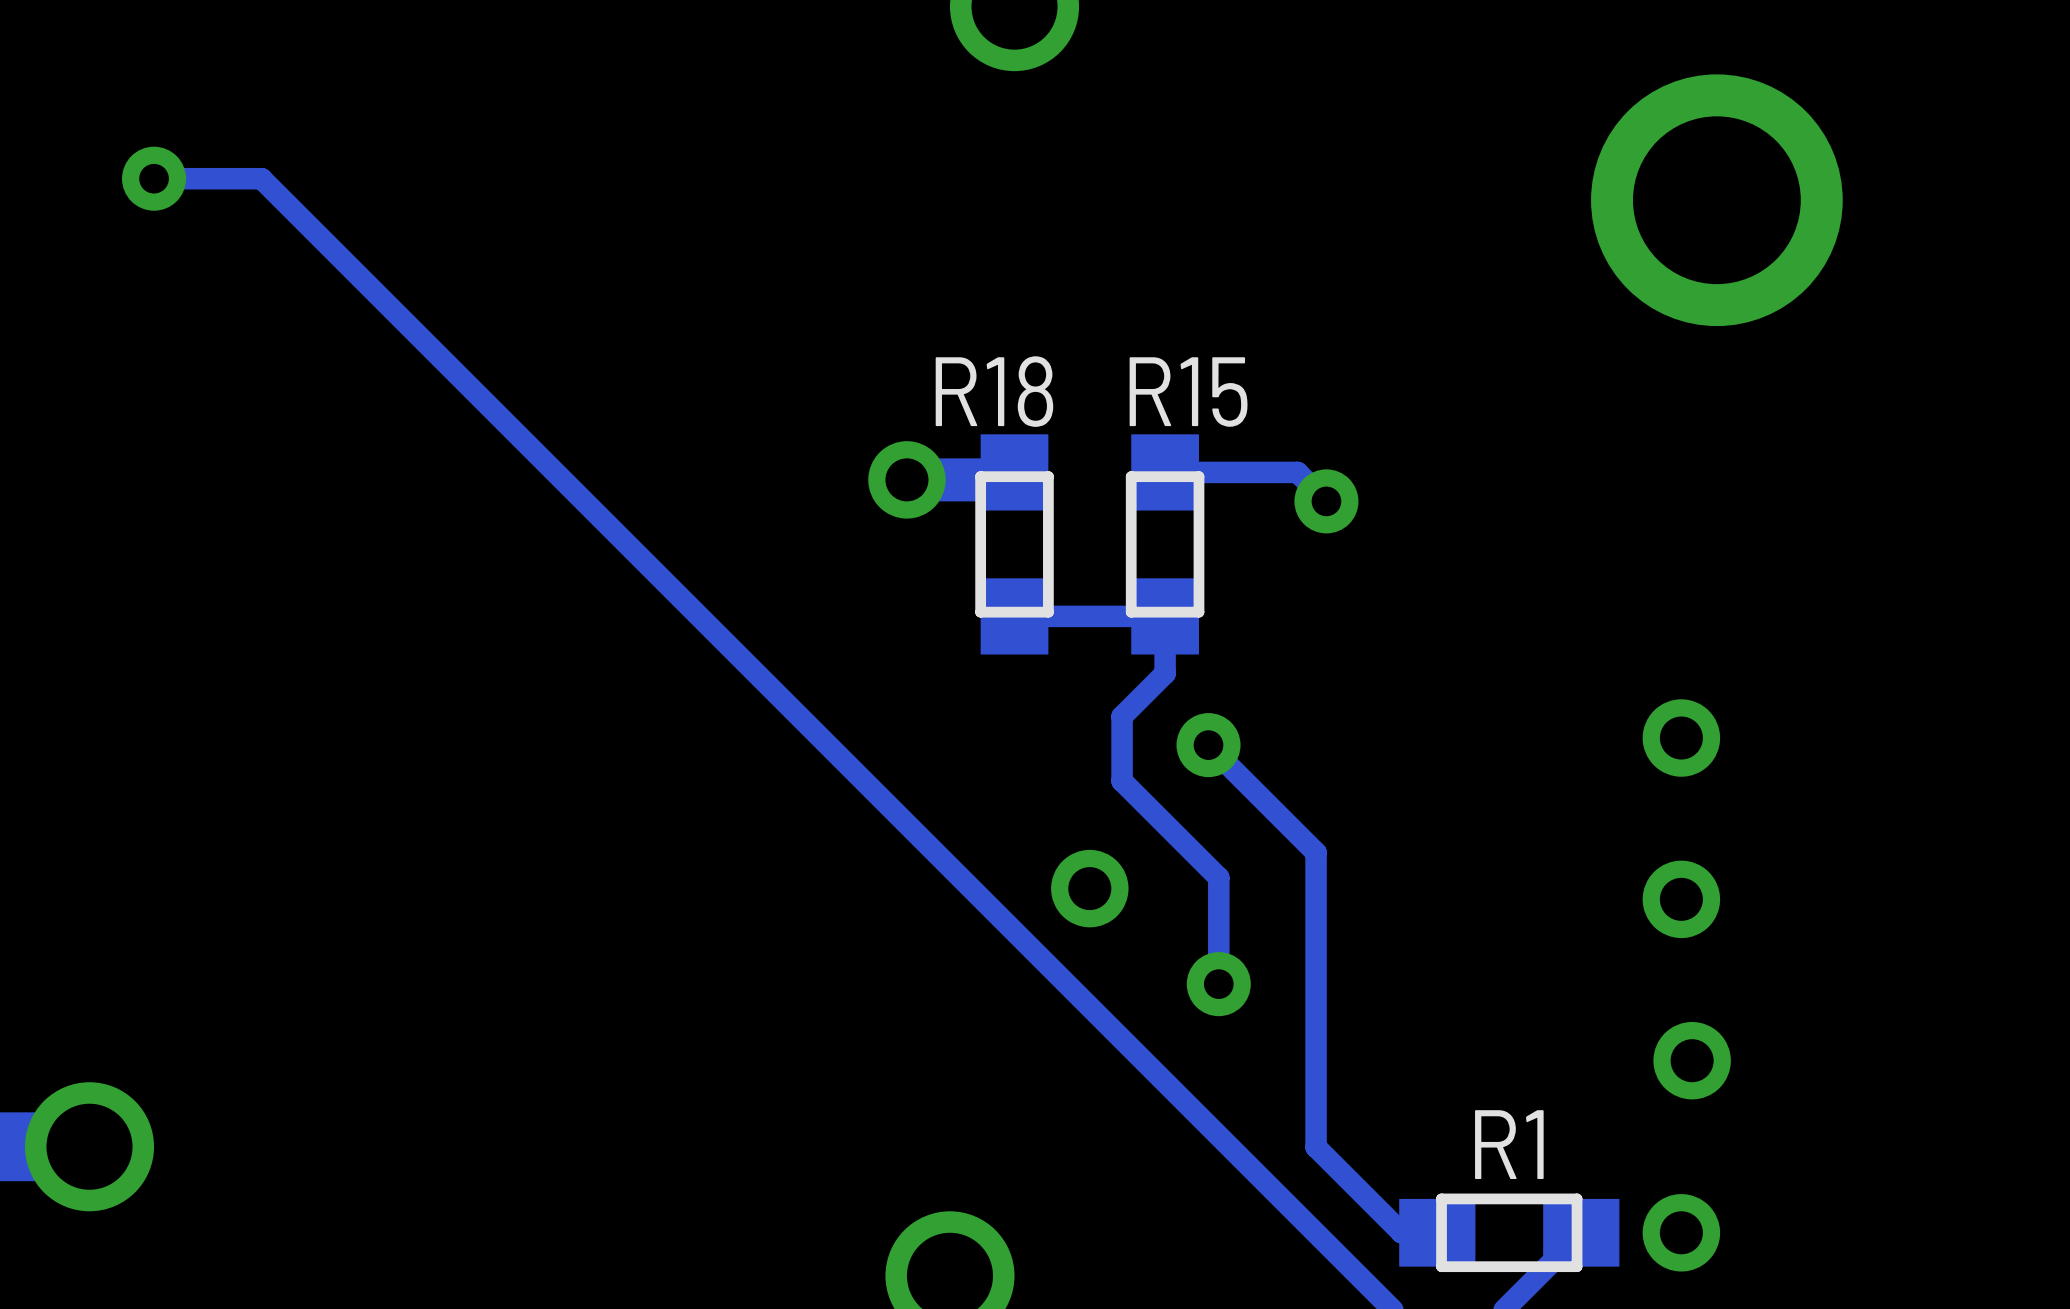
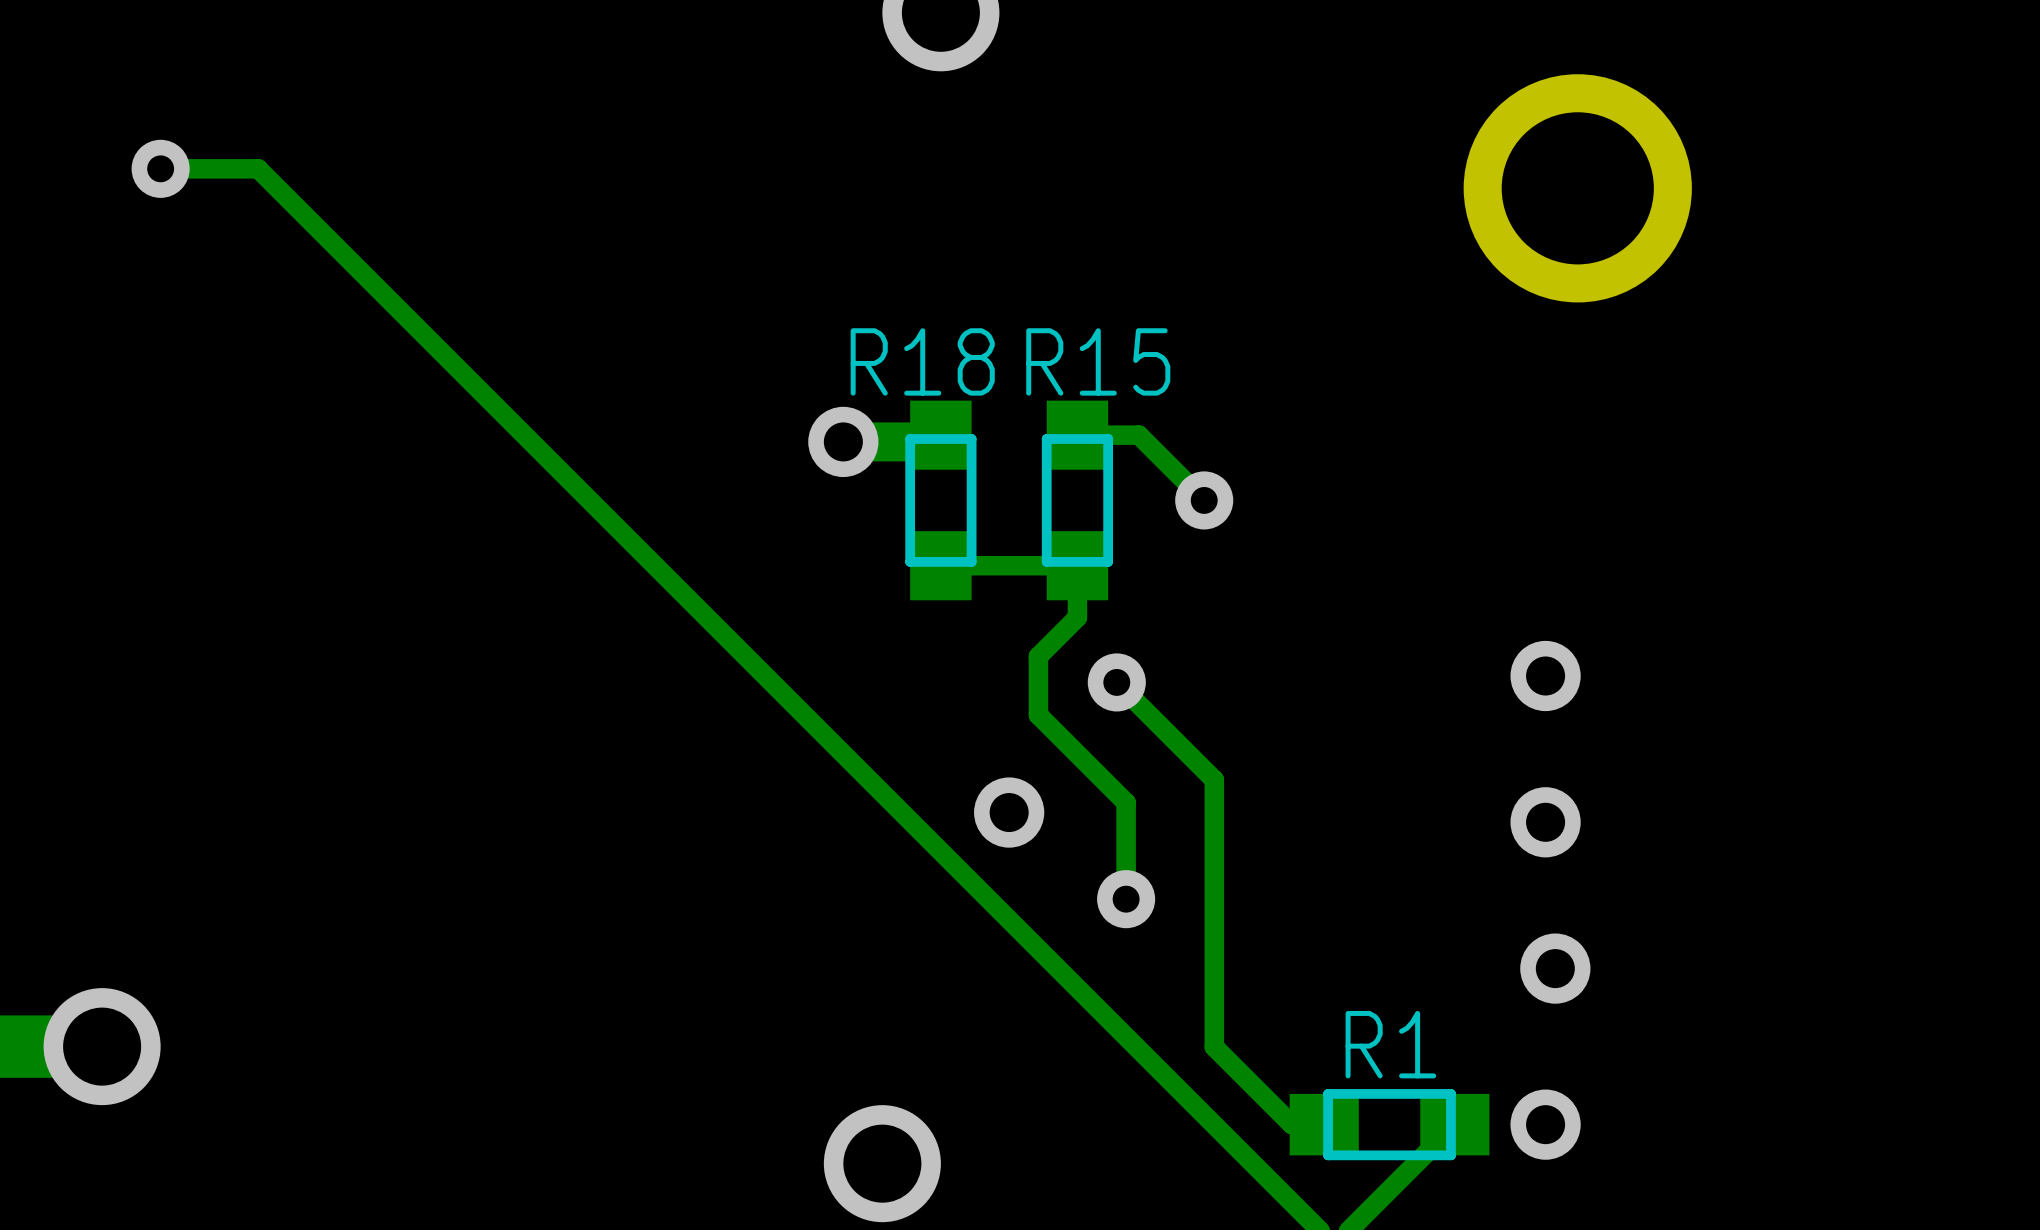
track: (1232, 472) (1297, 472) (1326, 501) -> (1138, 435) (1204, 500)
via position: (1326, 501) -> (1204, 500)

